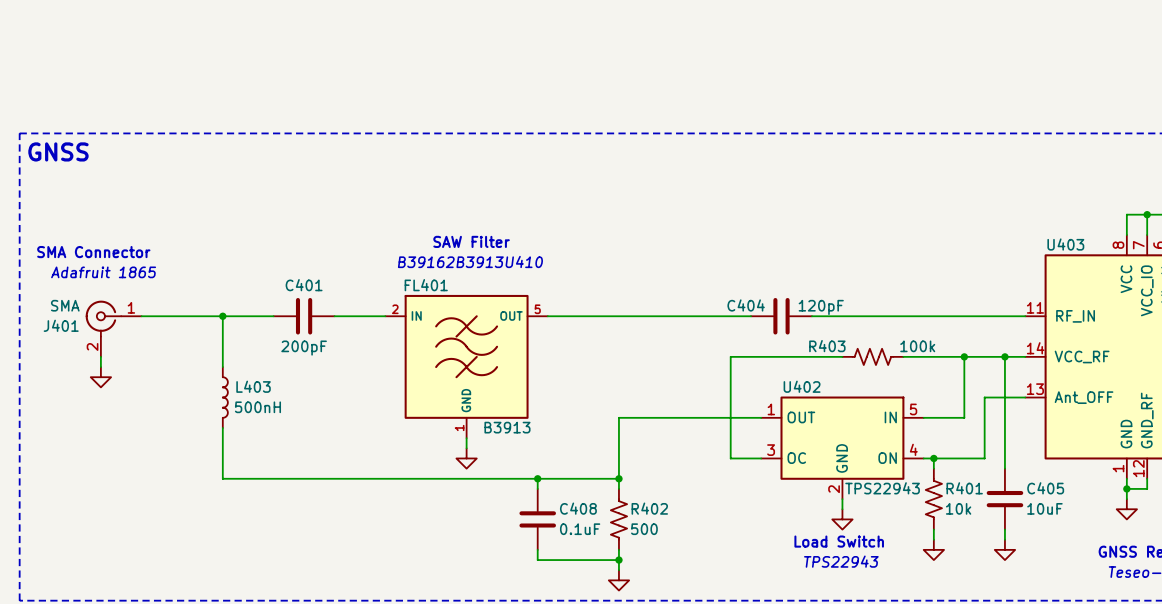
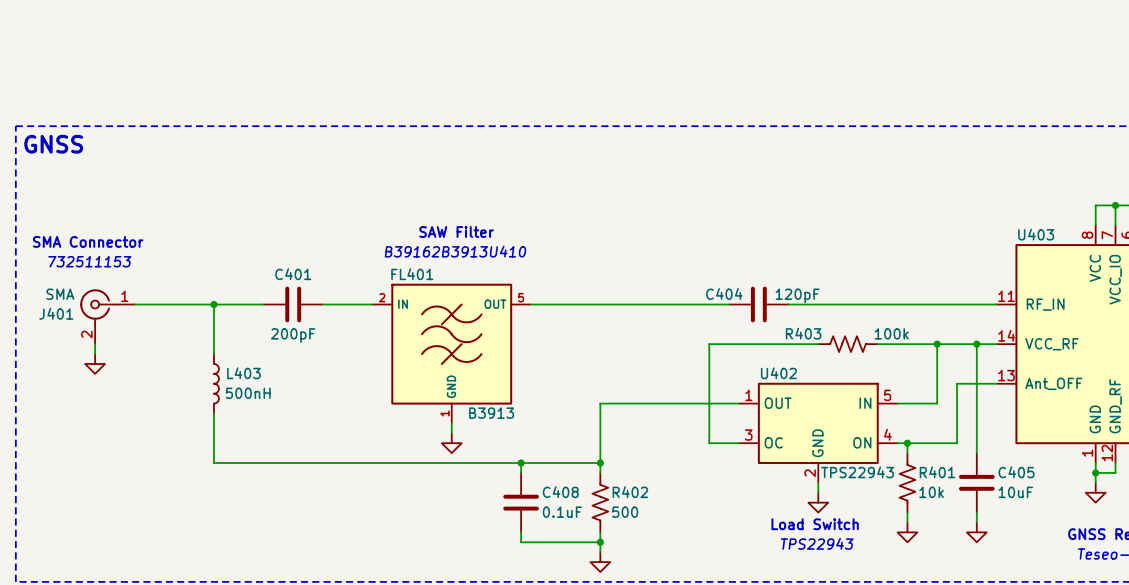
text: Adafruit 1865 (103, 272) -> 732511153 (89, 261)

